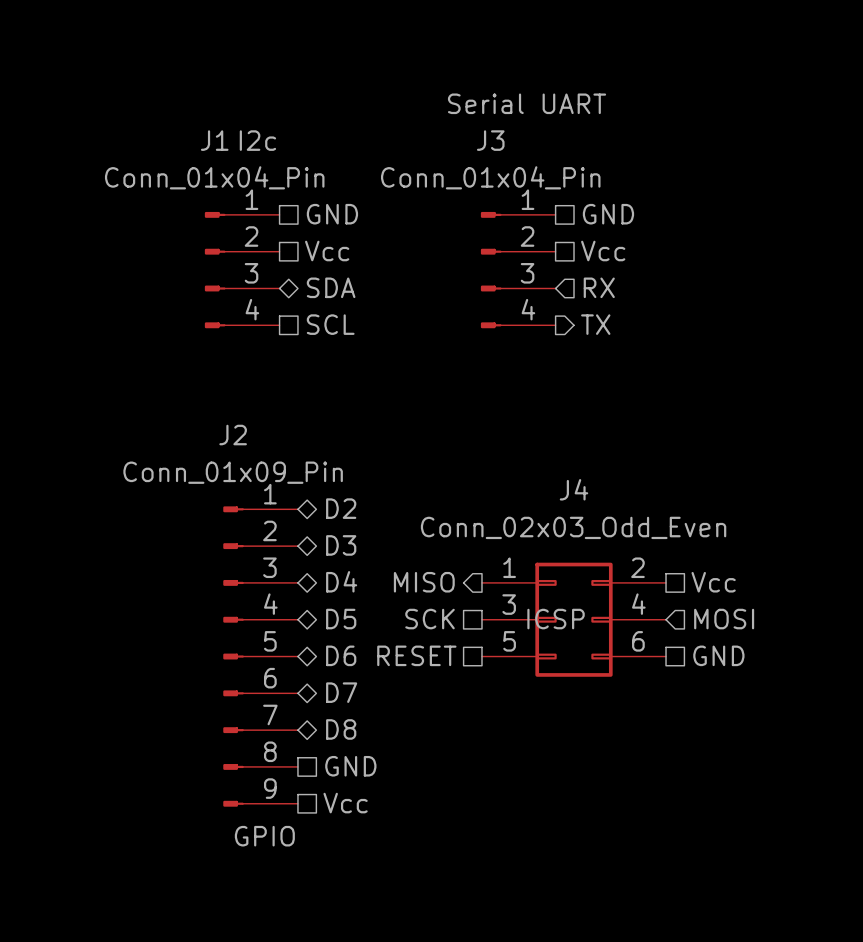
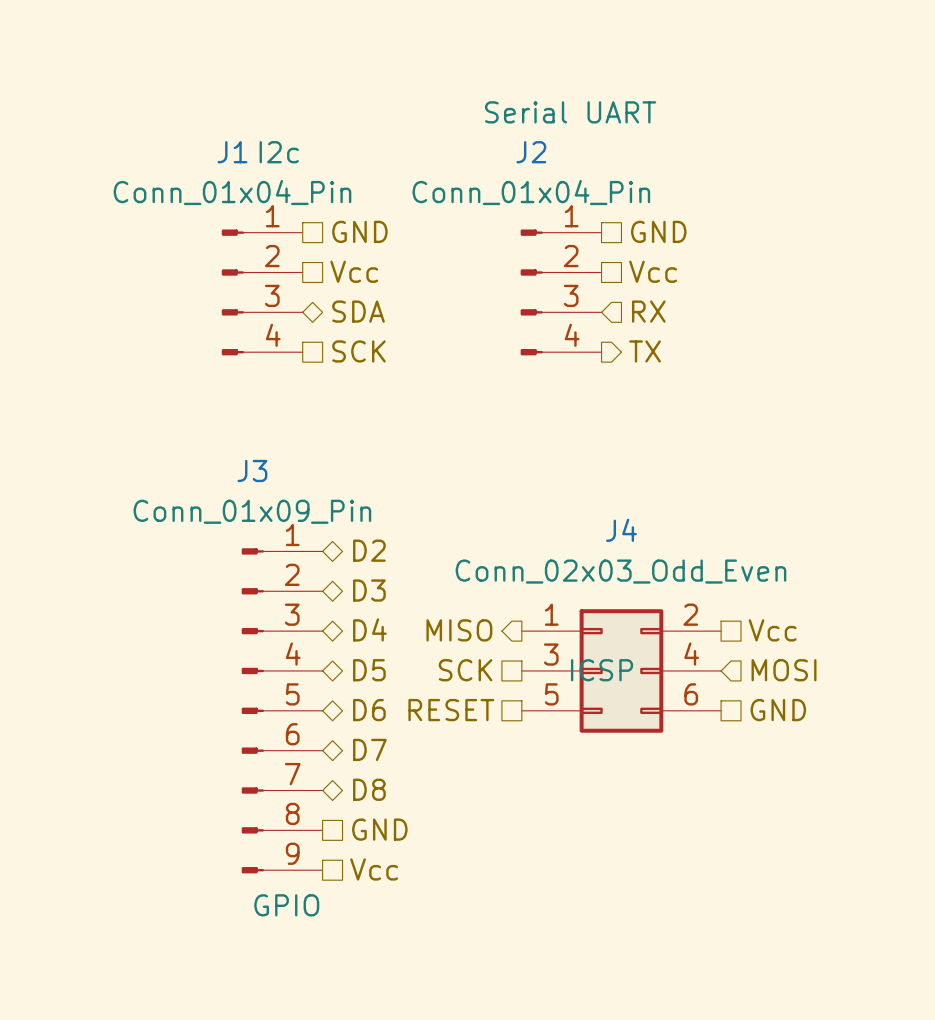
J3 name: J3 (490, 140) -> J2 (531, 152)
hierarchical label: SCL (330, 324) -> SCK (358, 351)
J2 name: J2 (233, 435) -> J3 (252, 470)

